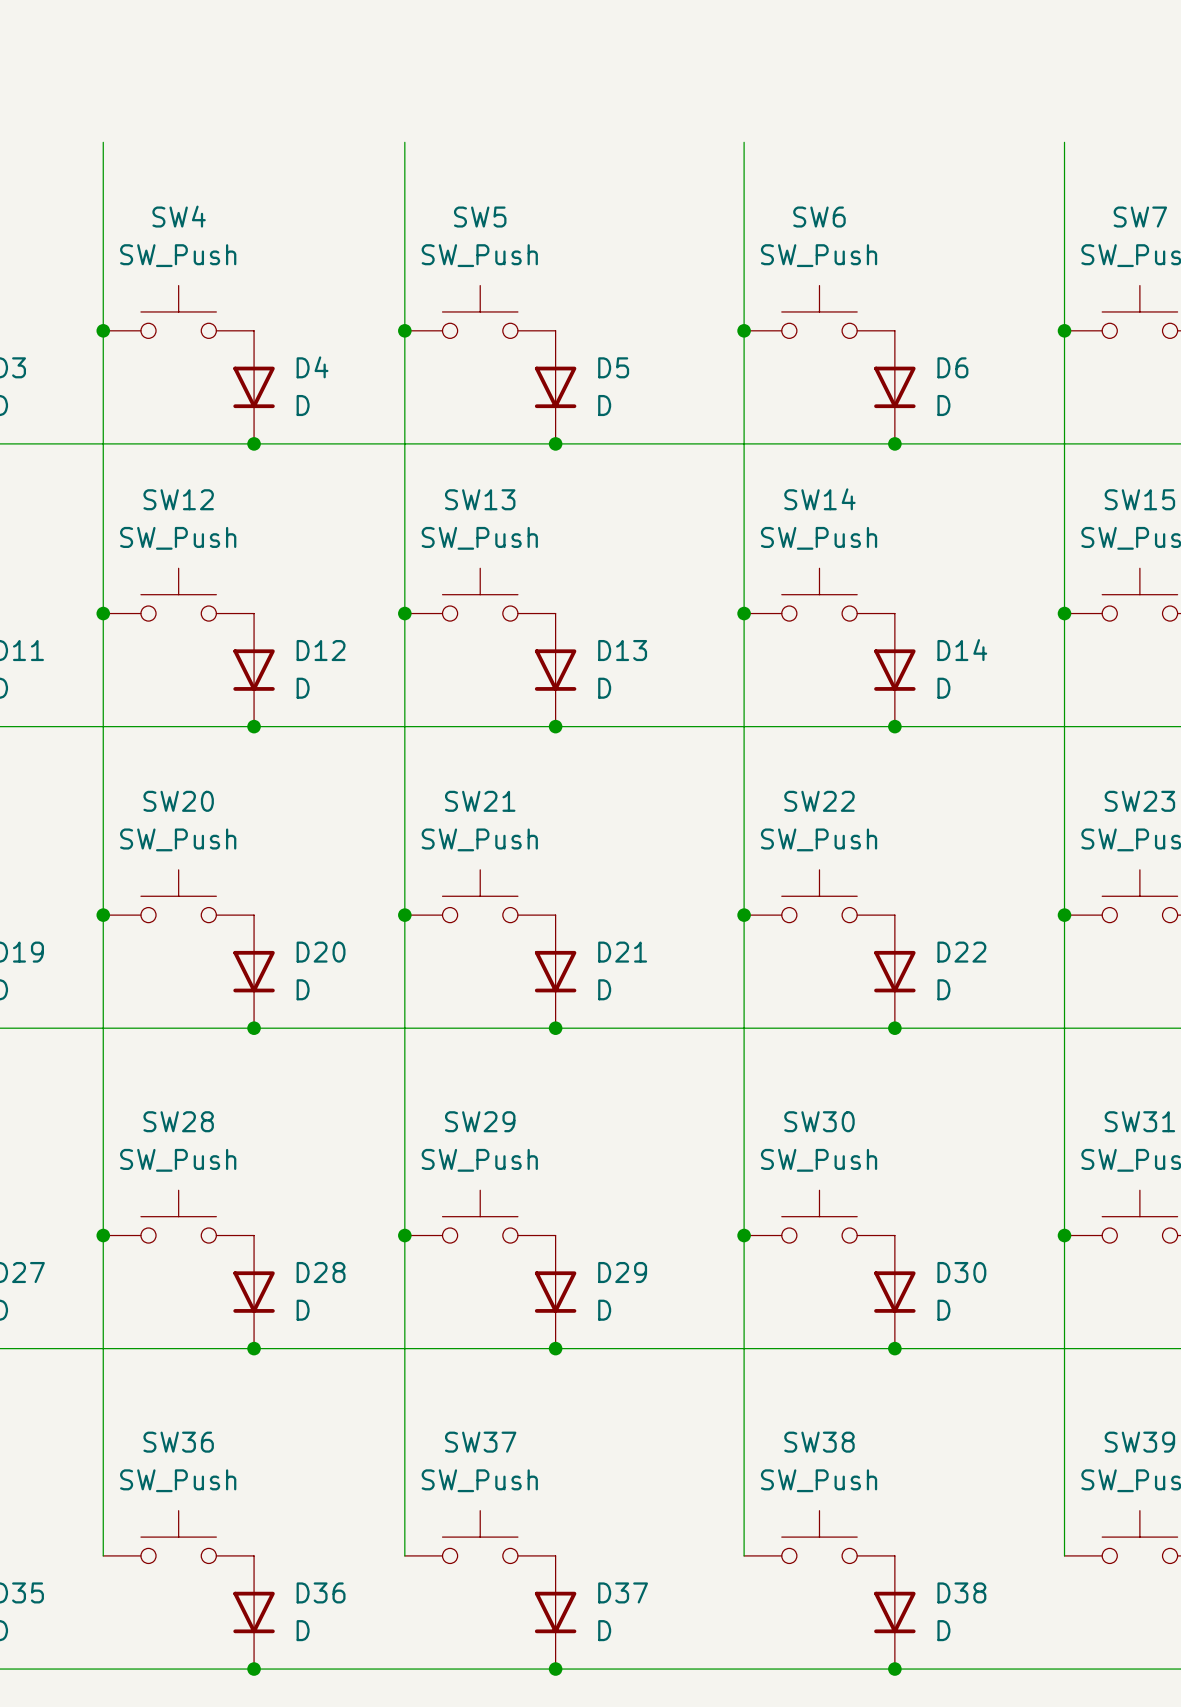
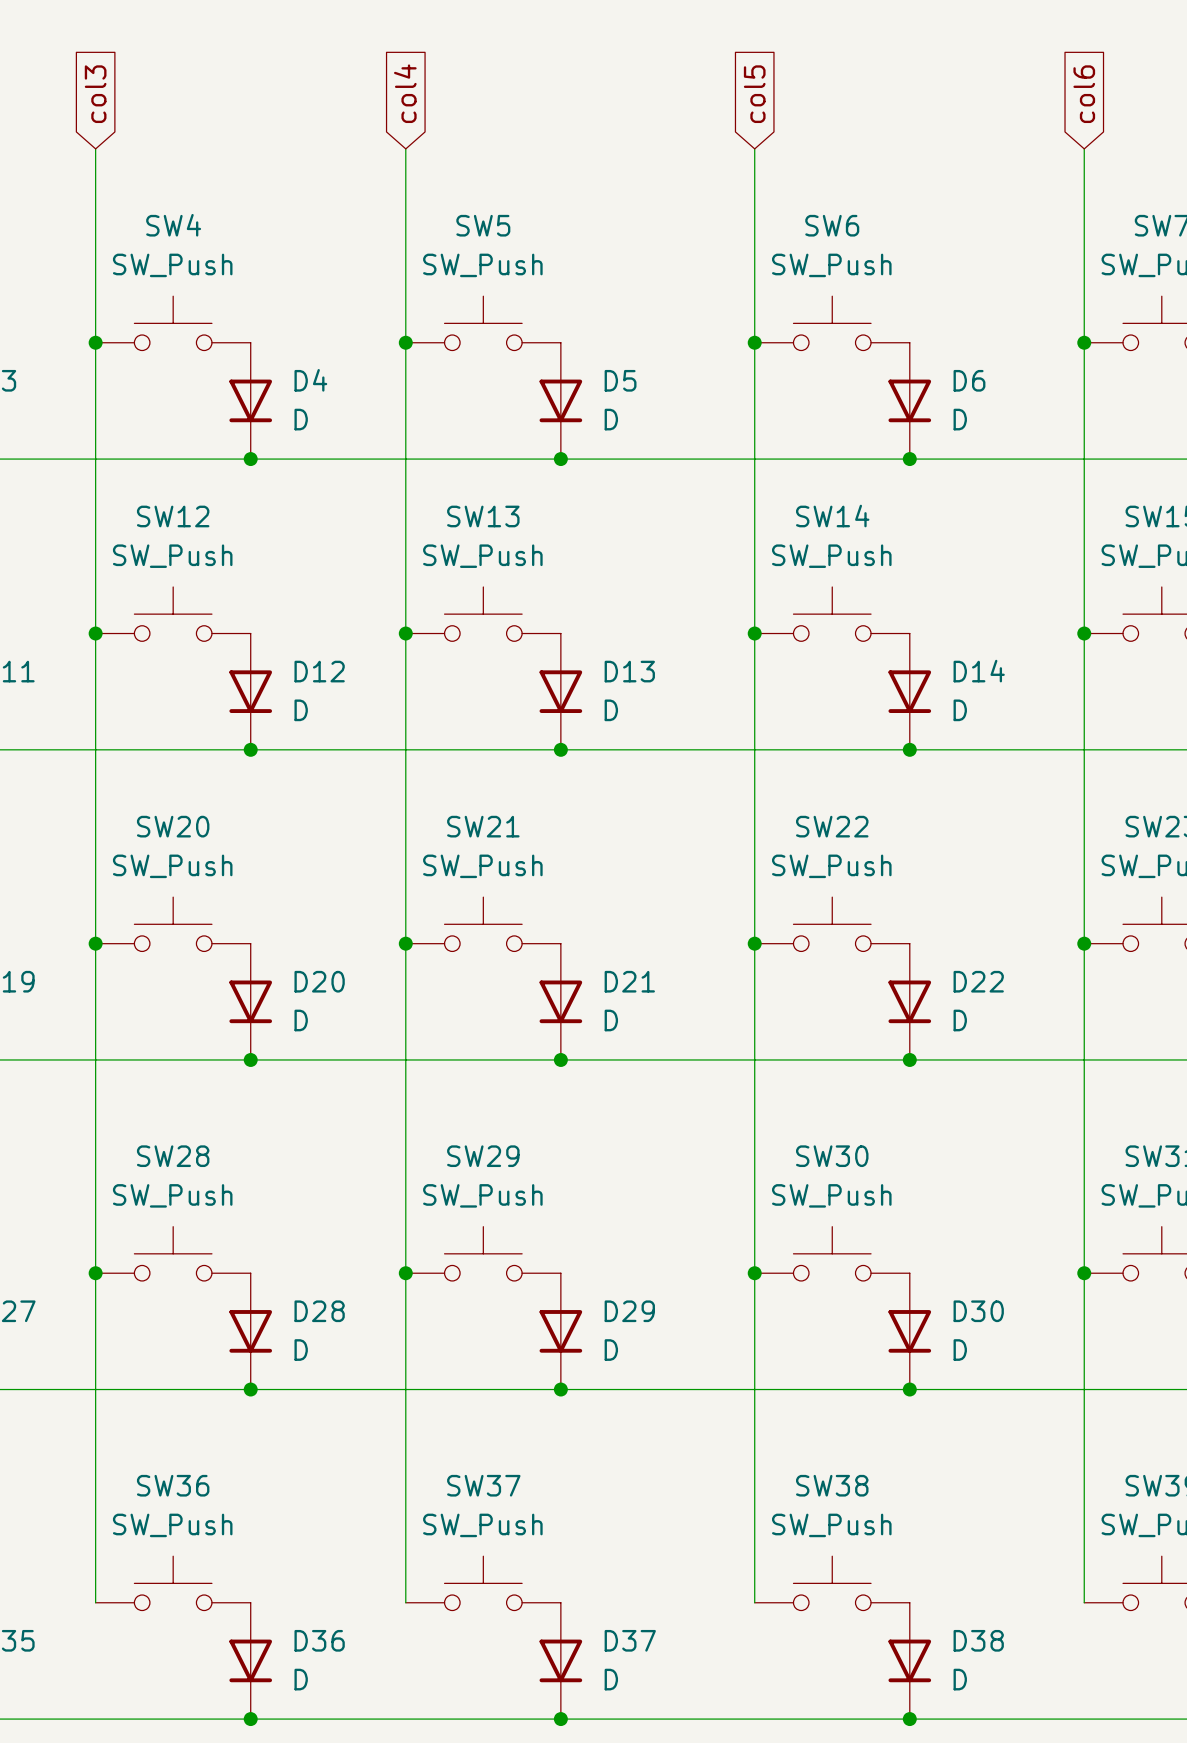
global label: none -> col4 (405, 93)
global label: none -> col3 (95, 94)
global label: none -> col5 (754, 94)
global label: none -> col6 (1084, 94)

